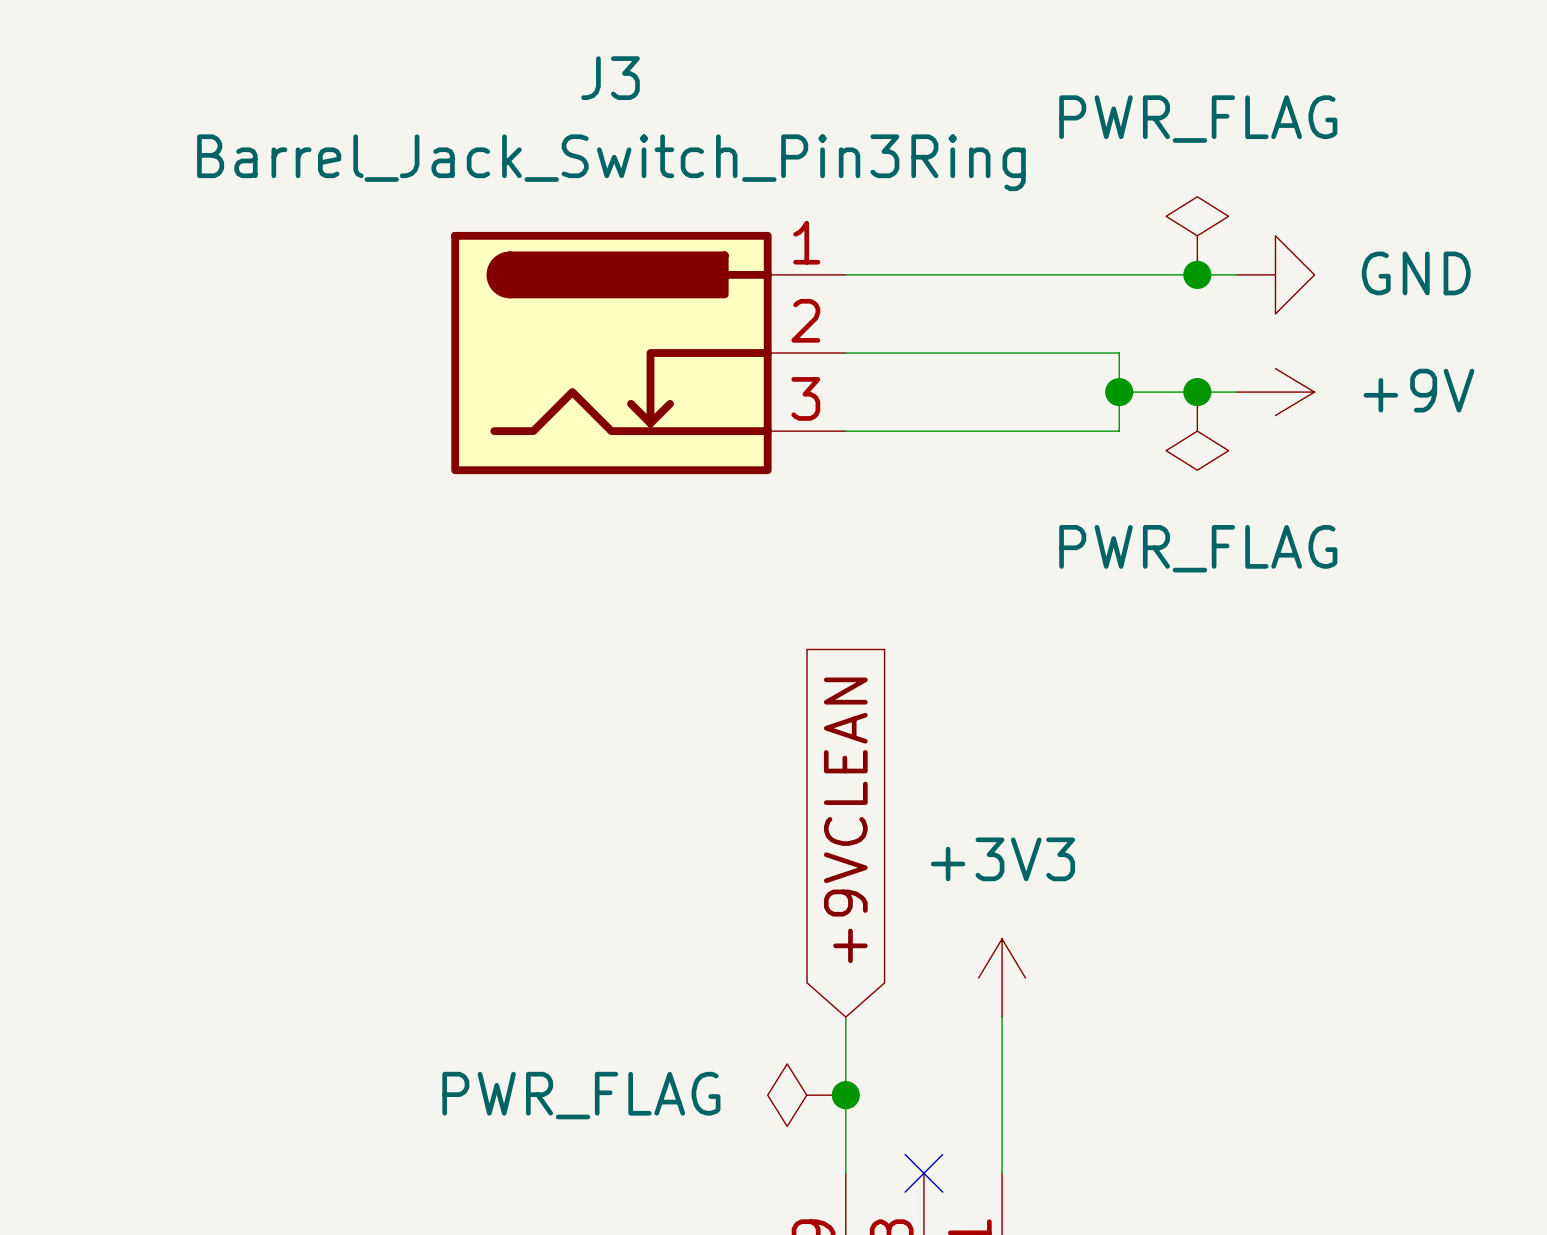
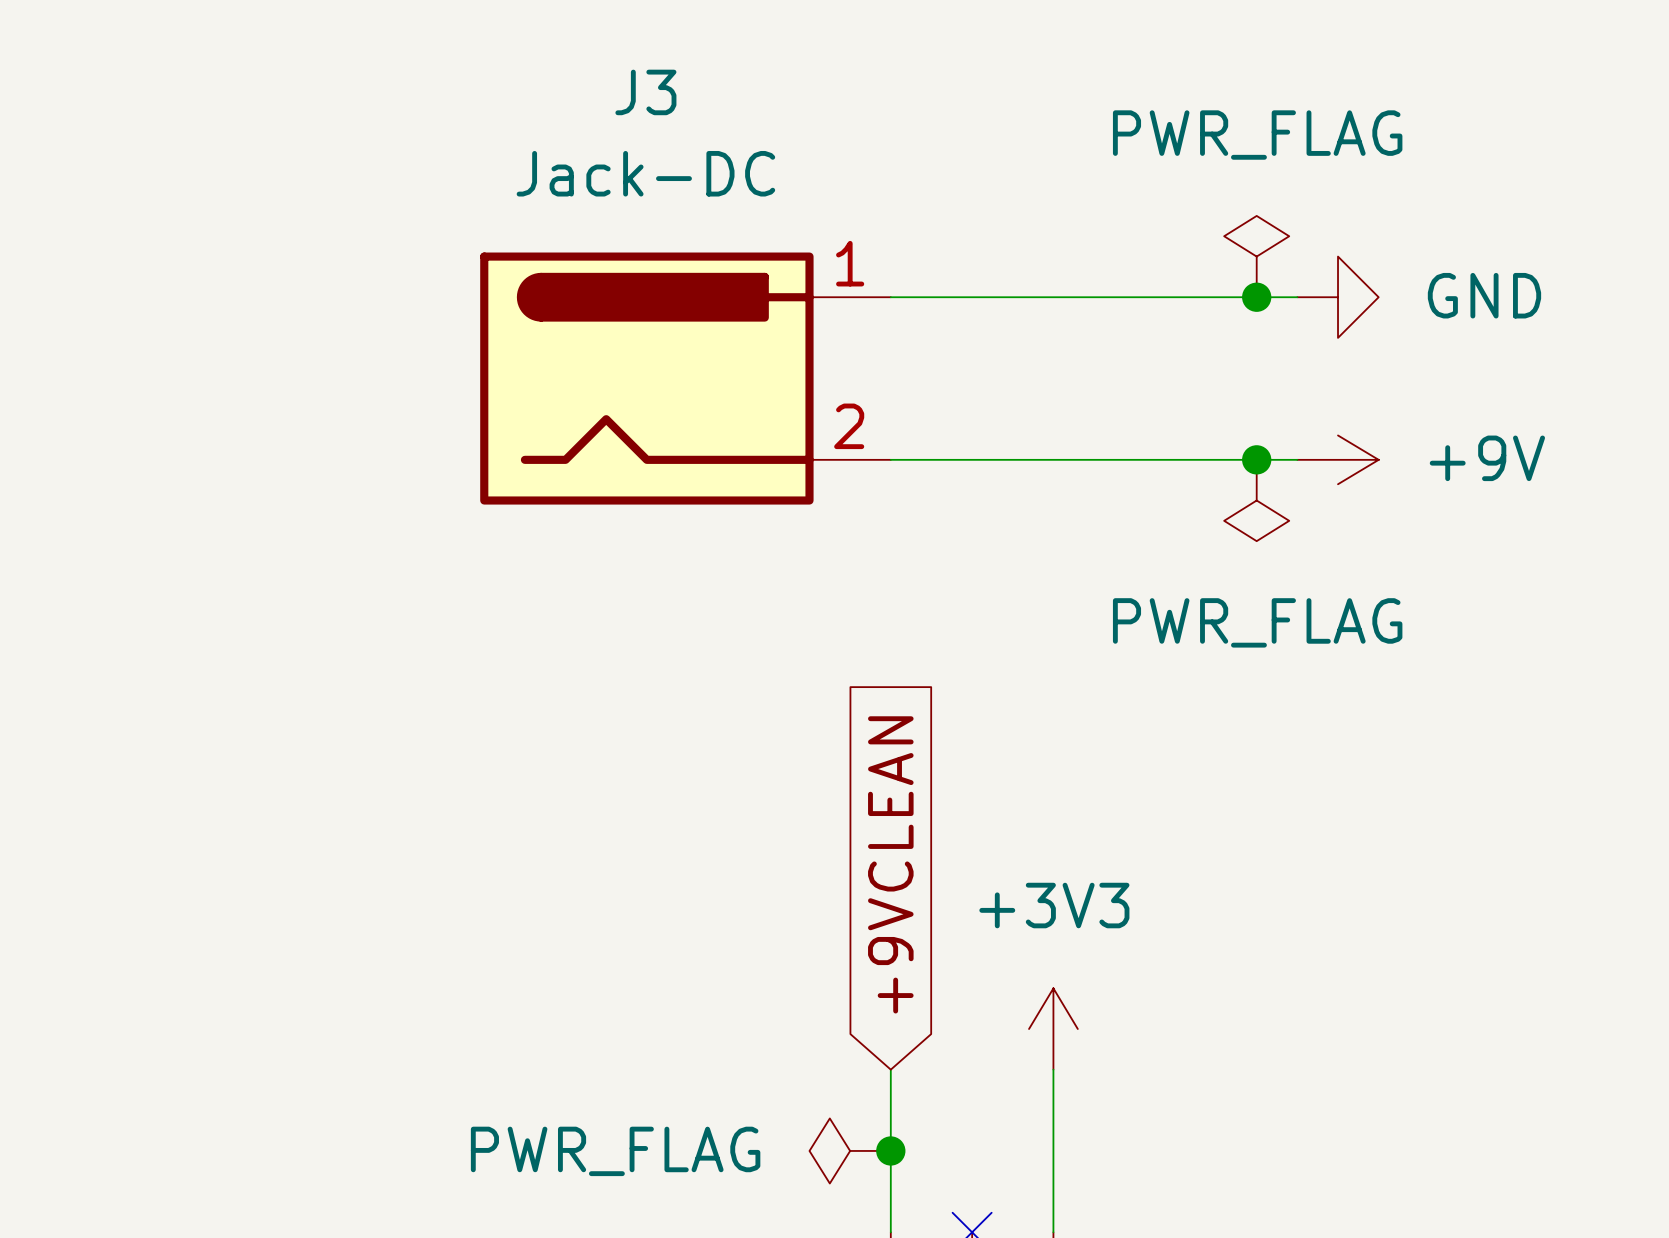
J3 value: Barrel_Jack_Switch_Pin3Ring (611, 162) -> Jack-DC (645, 173)
J3 symbol: [451, 231, 846, 475] -> [480, 252, 891, 505]
wire: (845, 353) (1119, 353) (1119, 431) -> (1297, 459) (1175, 459)
wire: (1119, 392) (1236, 392) -> none
junction: (1119, 392) -> none
junction position: (1197, 392) -> (1256, 459)
power symbol position: +9V (1275, 392) -> +9V (1338, 459)
power symbol position: PWR_FLAG (1197, 431) -> PWR_FLAG (1256, 500)

